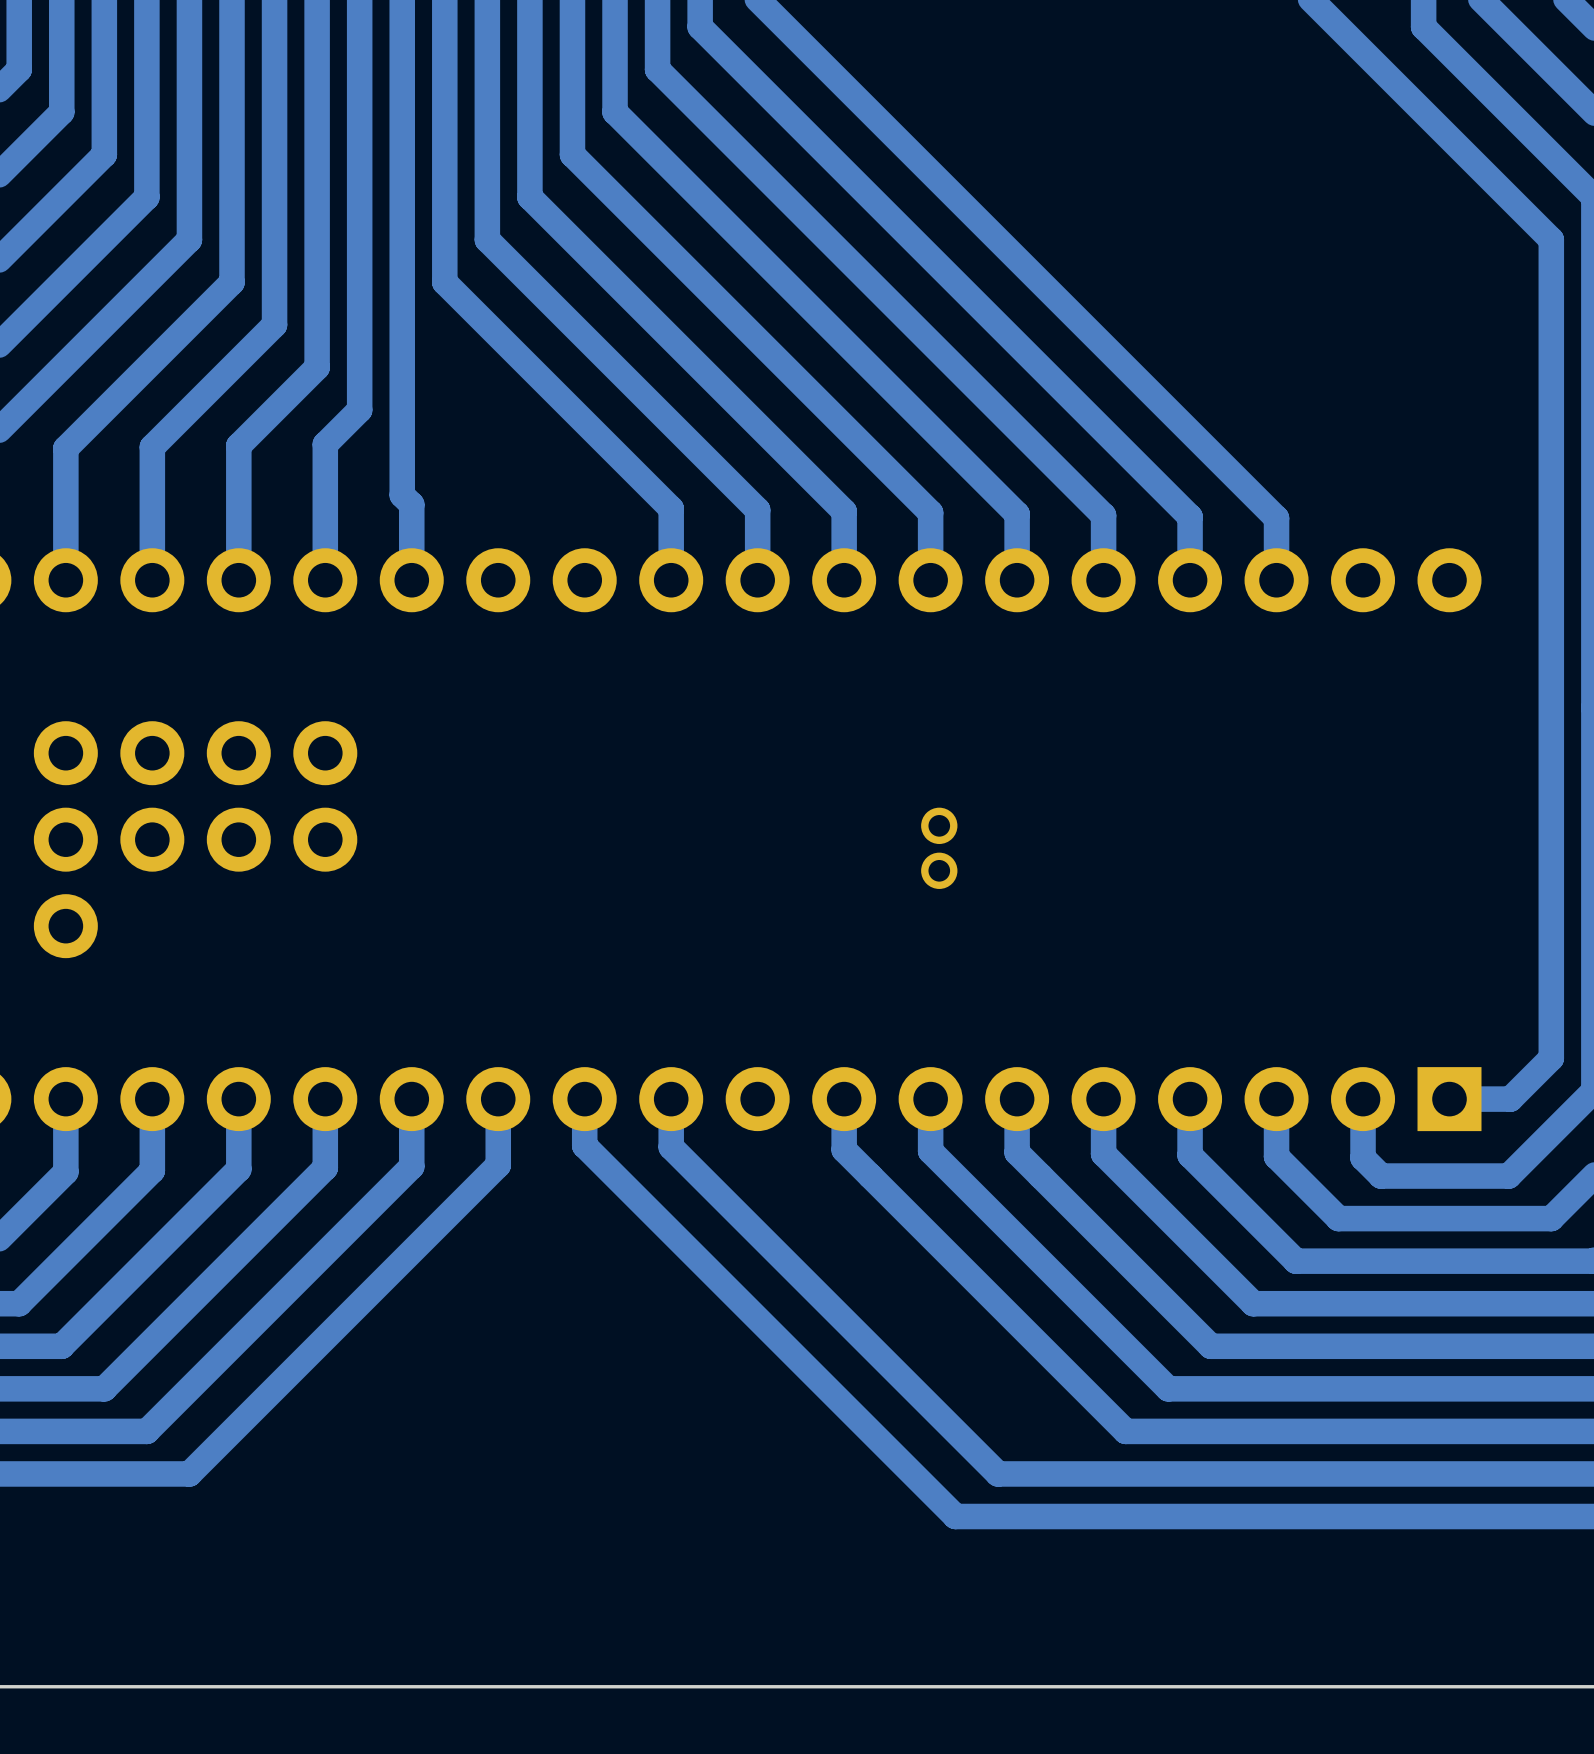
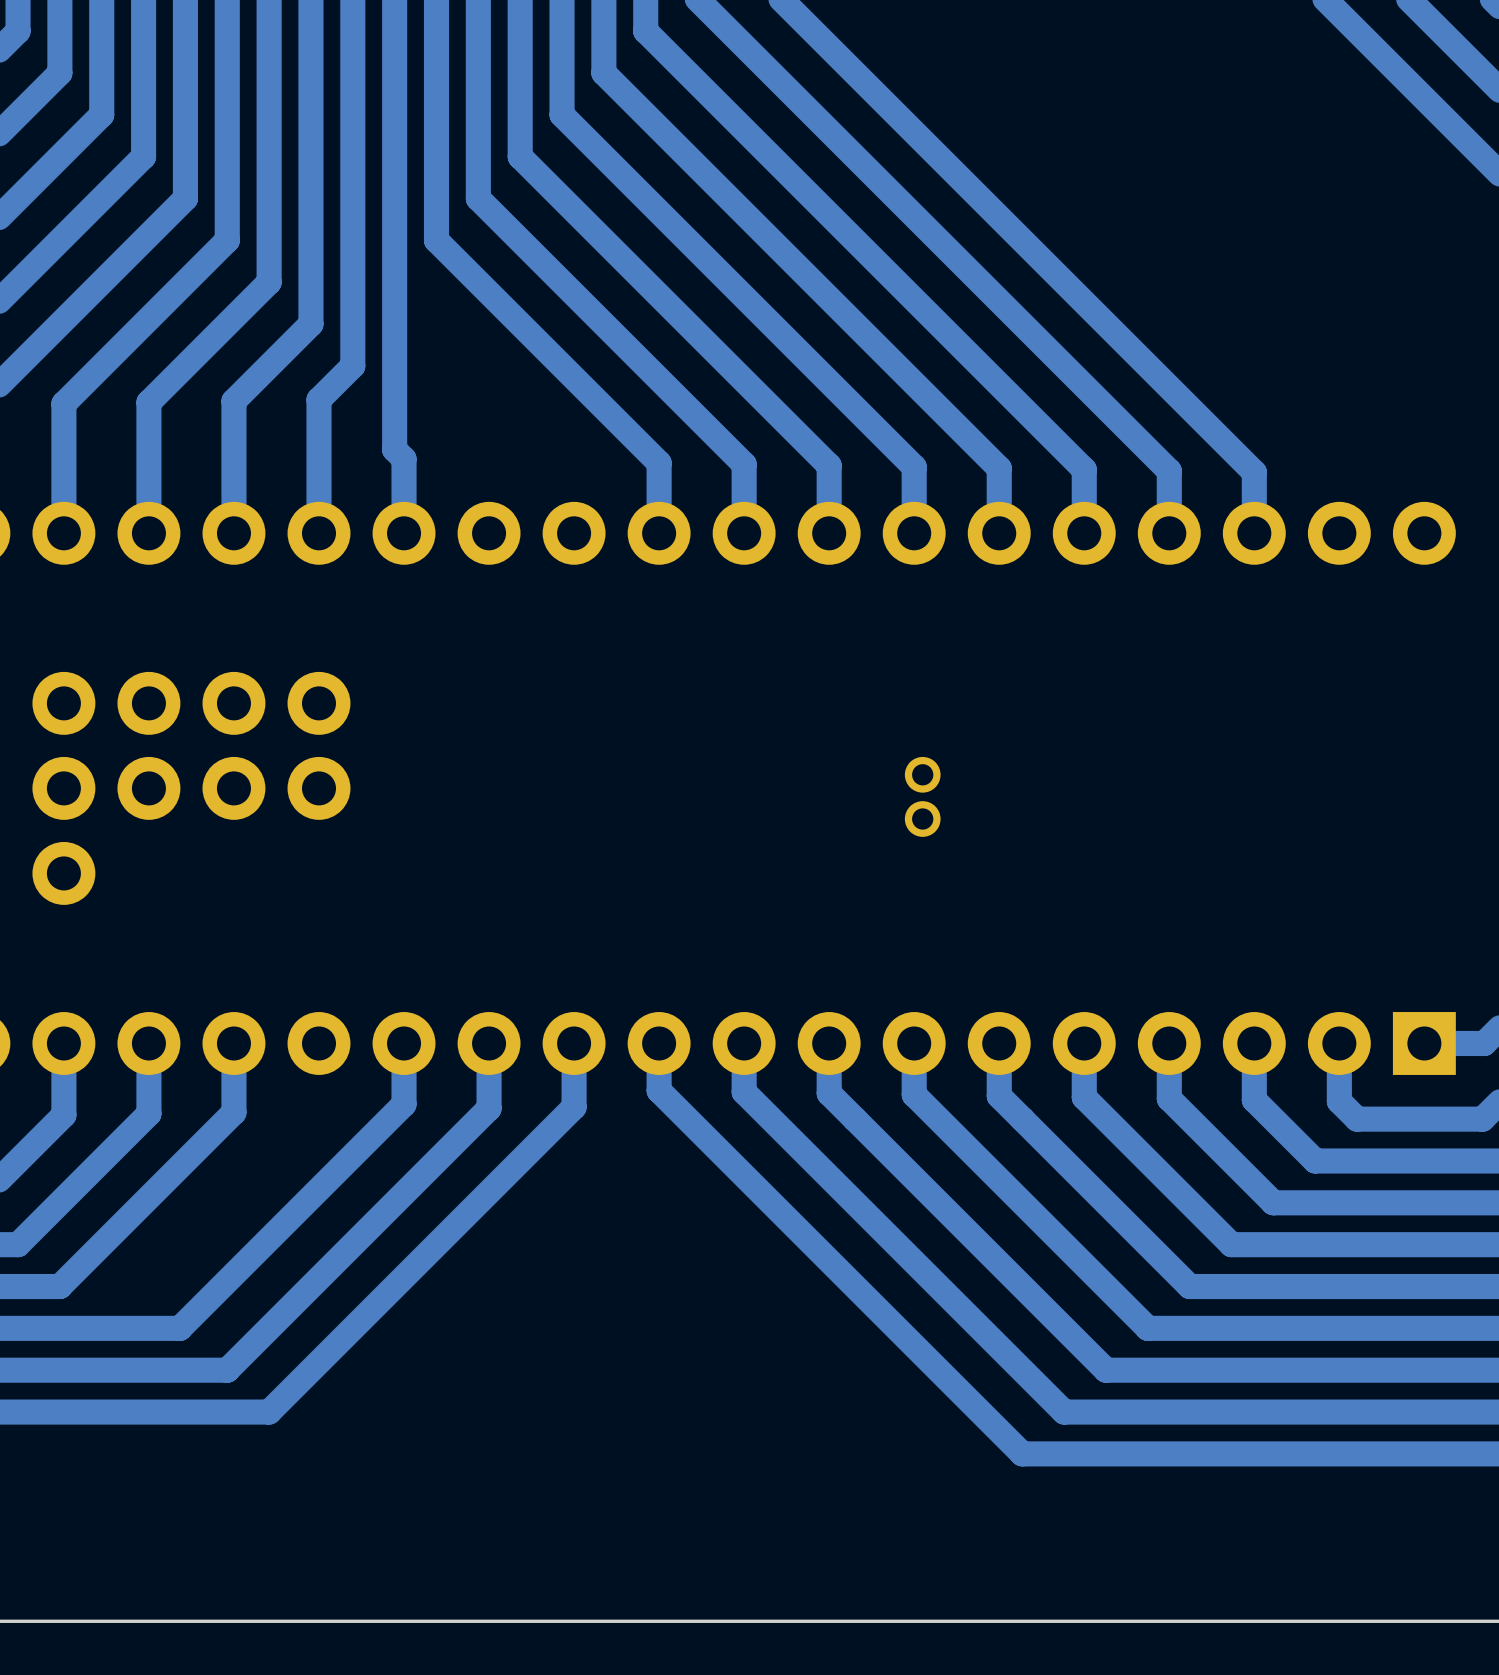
track: (325, 1099) (325, 1167) (104, 1388) -> none
track: none -> (744, 1043) (744, 1092) (1064, 1412)
track: (584, 1145) (955, 1516) (1040, 1516) -> (574, 1089) (574, 1107) (269, 1412) (185, 1412)
track: (411, 1160) (411, 1166) (146, 1431) -> (404, 1104) (179, 1328) (101, 1328)
track: (232, 1431) (189, 1473) -> (227, 1370) (143, 1370)
track: (1083, 1473) (998, 1473) -> (1022, 1453) (980, 1412)

